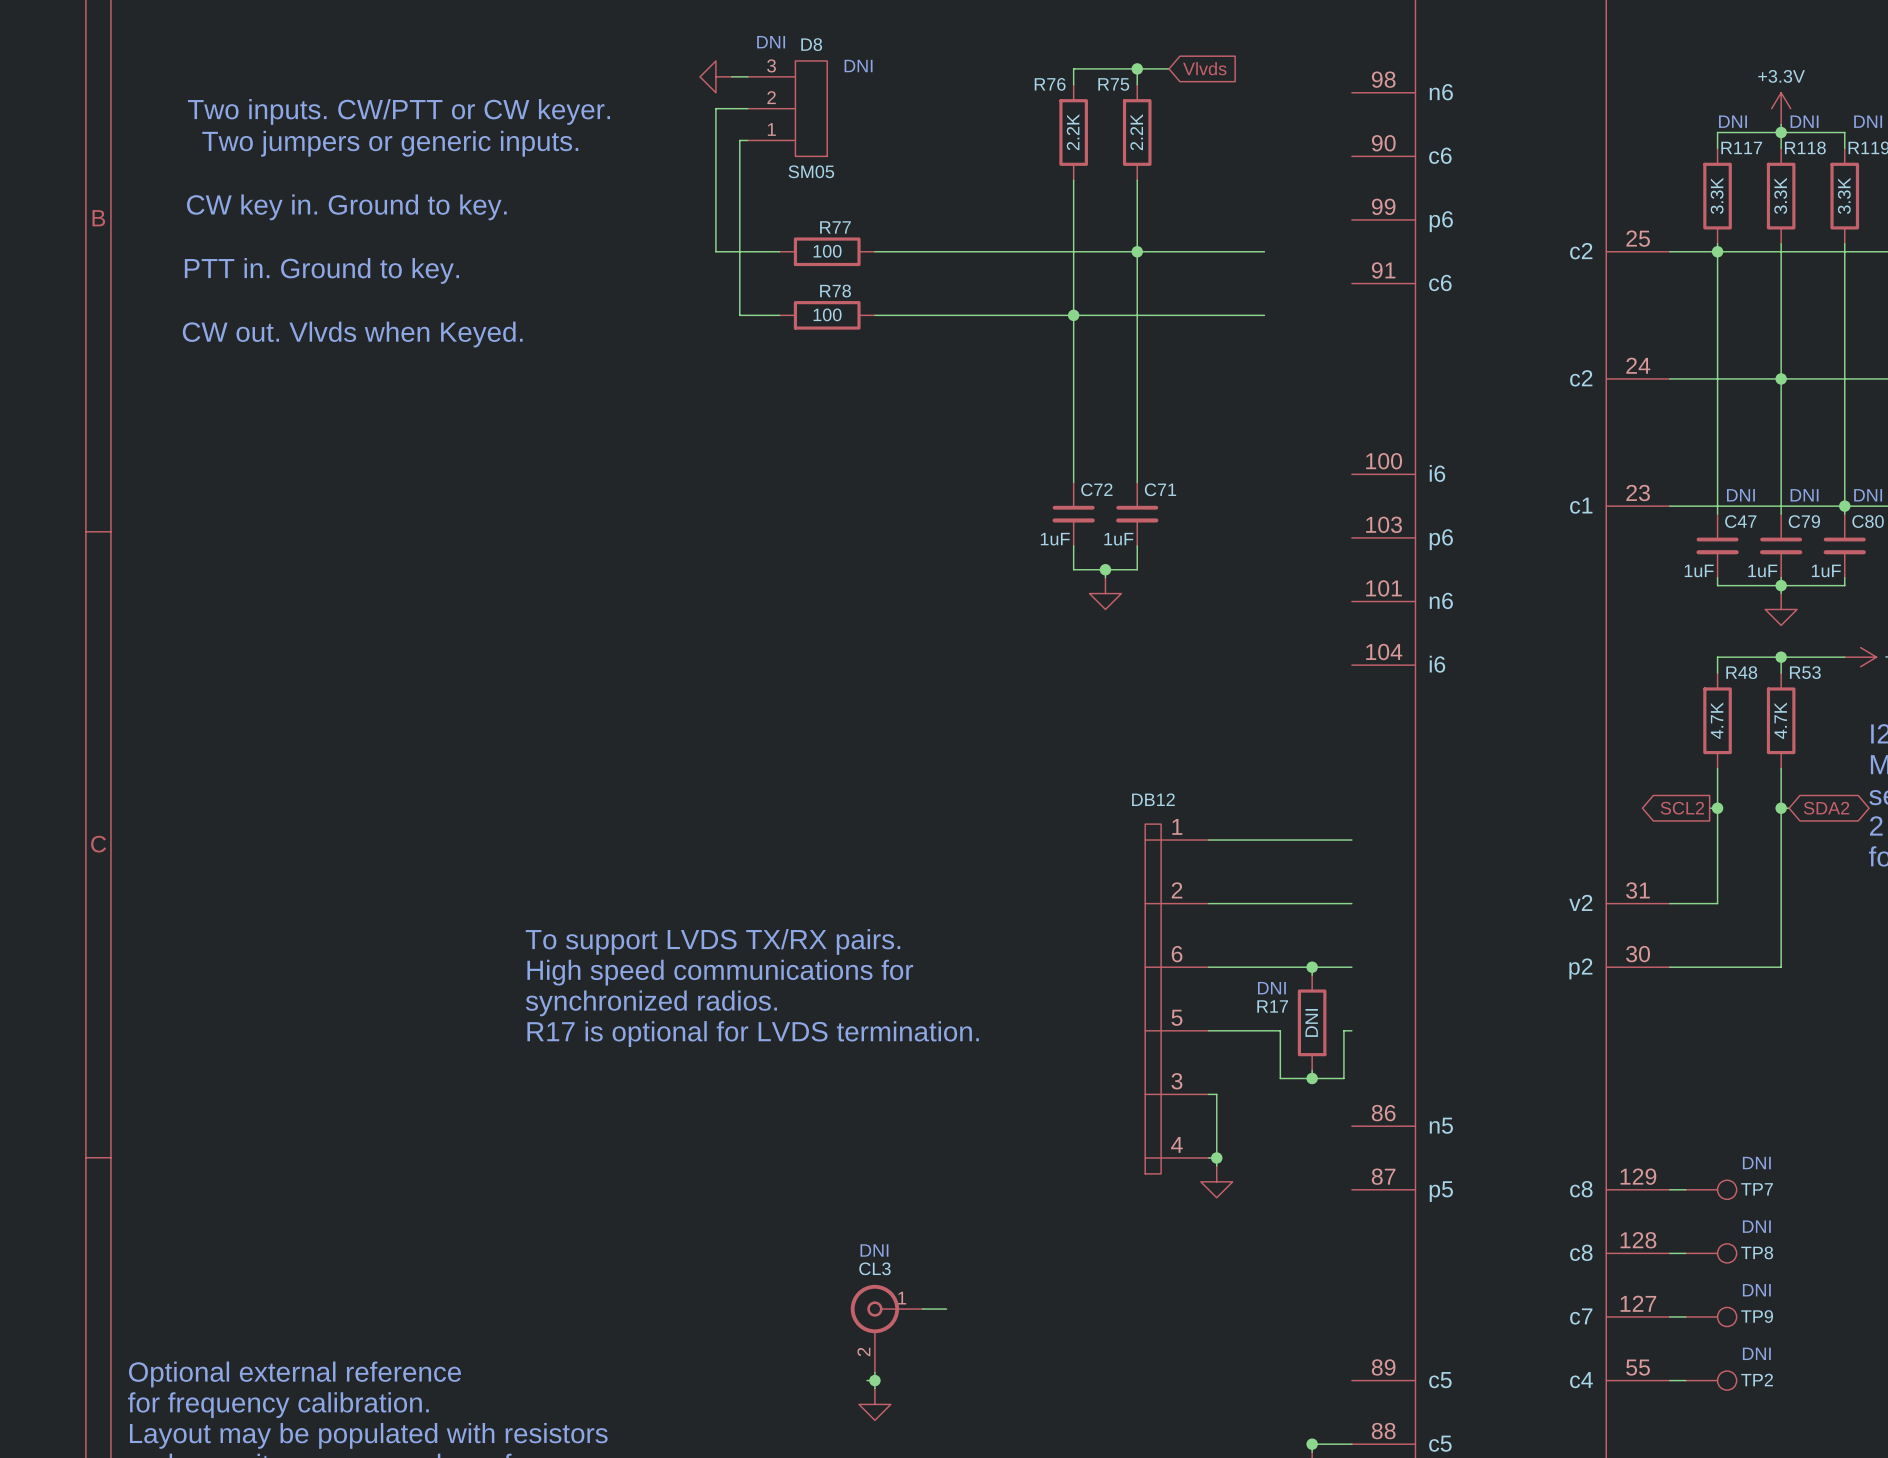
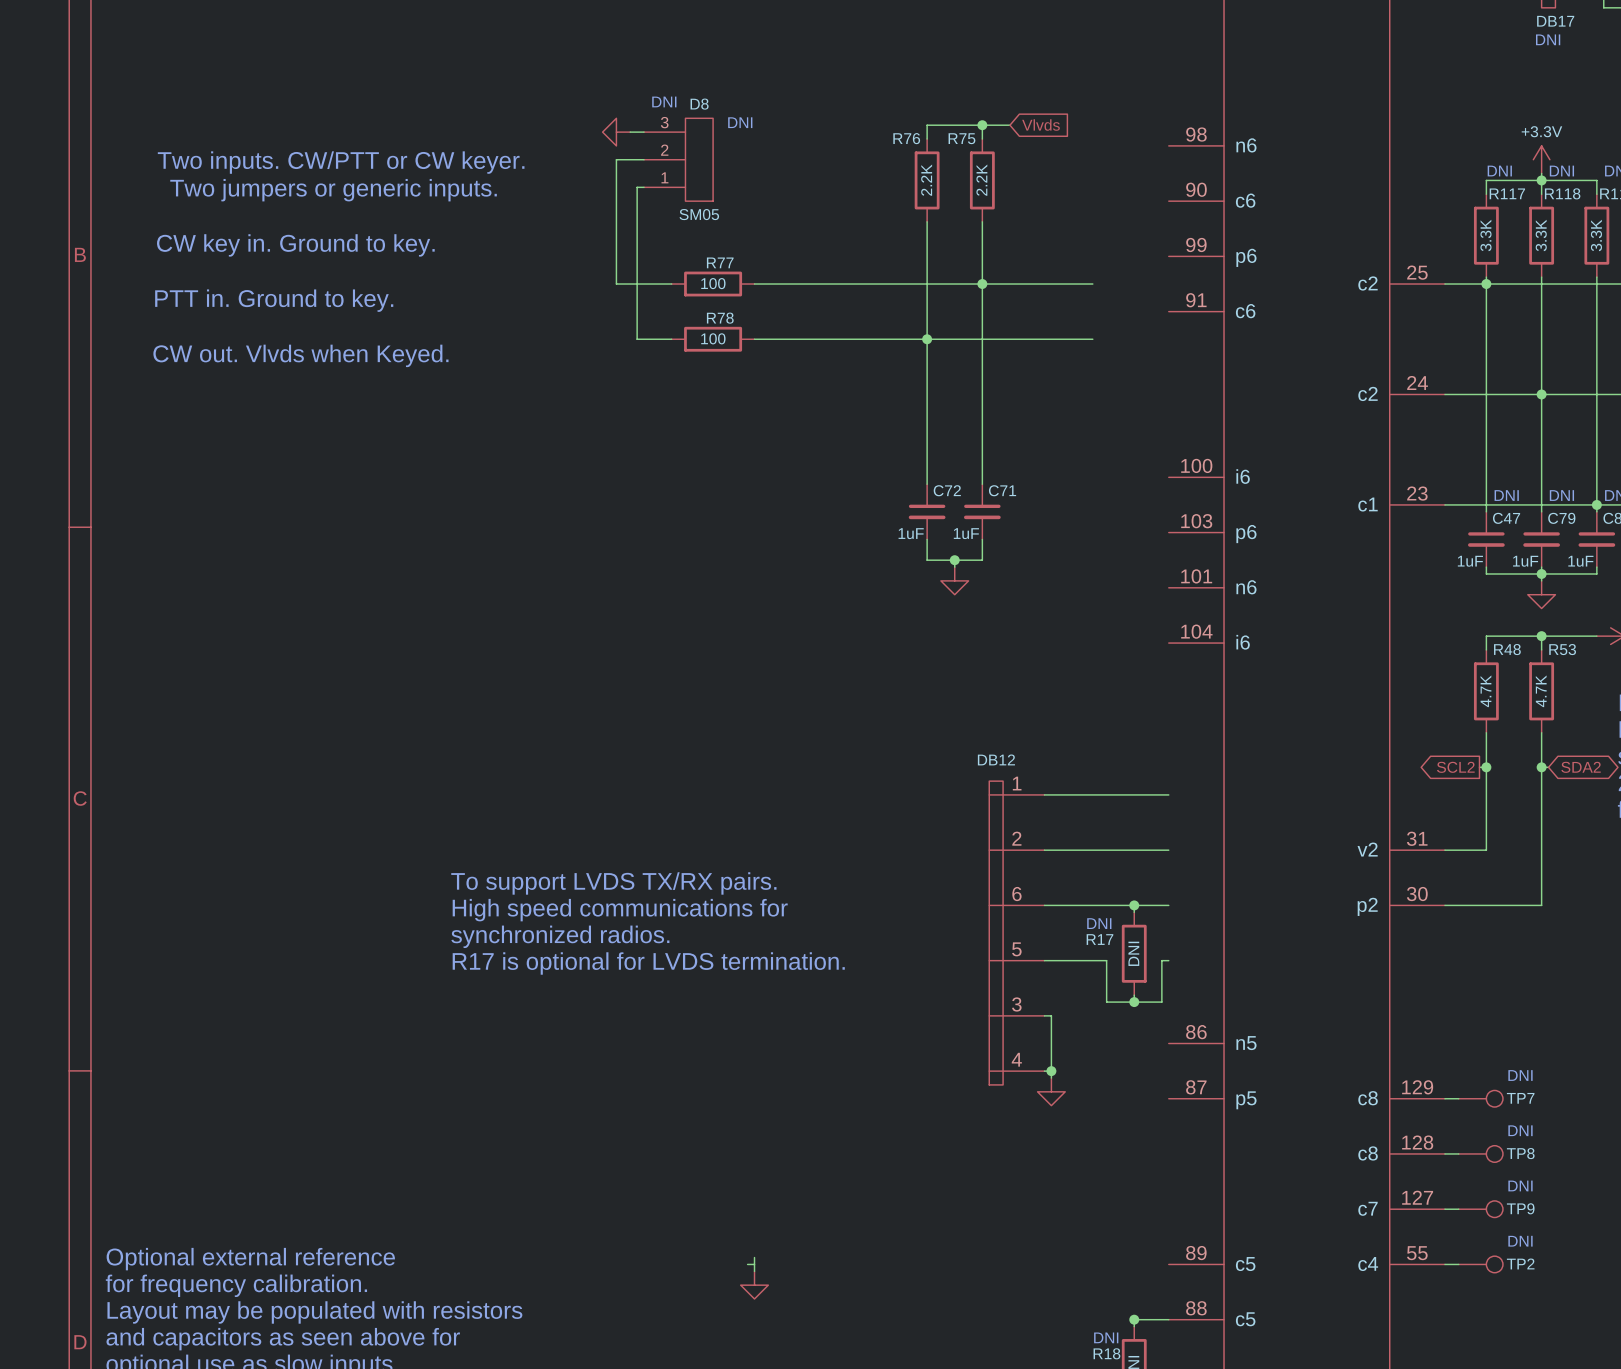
text: DNI (874, 1250) -> none
wire: (922, 1309) (946, 1309) -> none
CL3: (886, 1328) -> none
junction: (874, 1380) -> none

